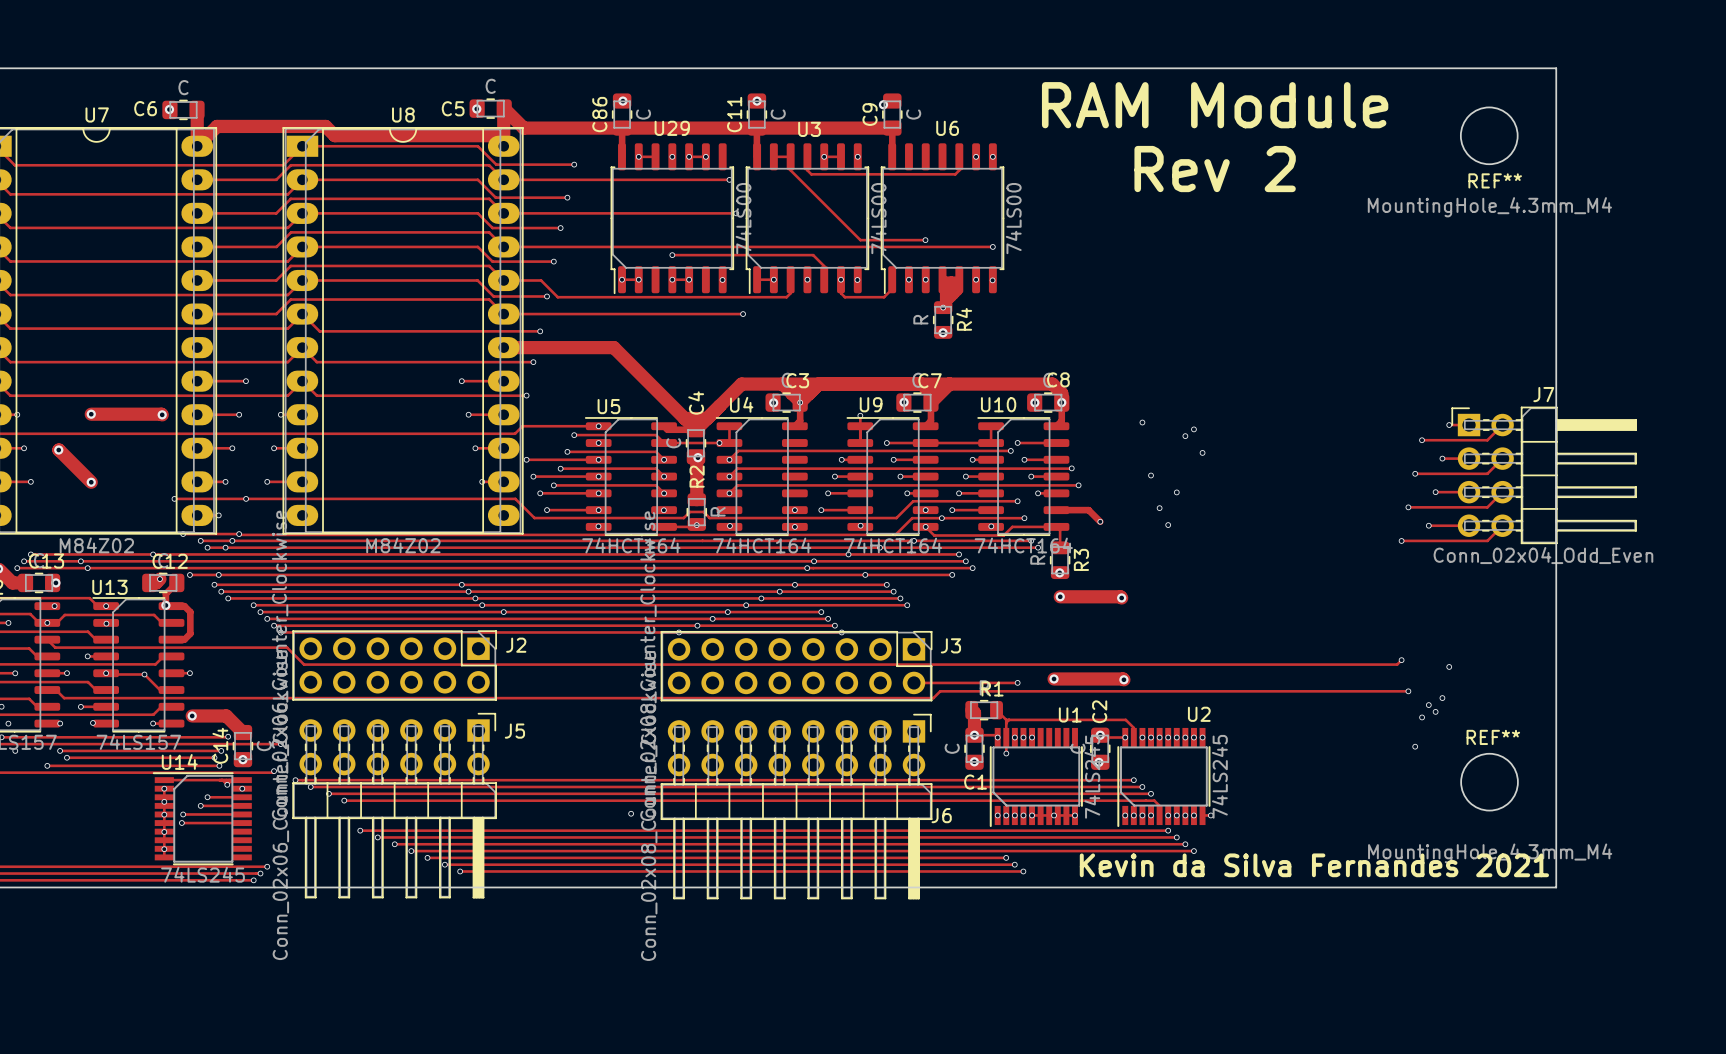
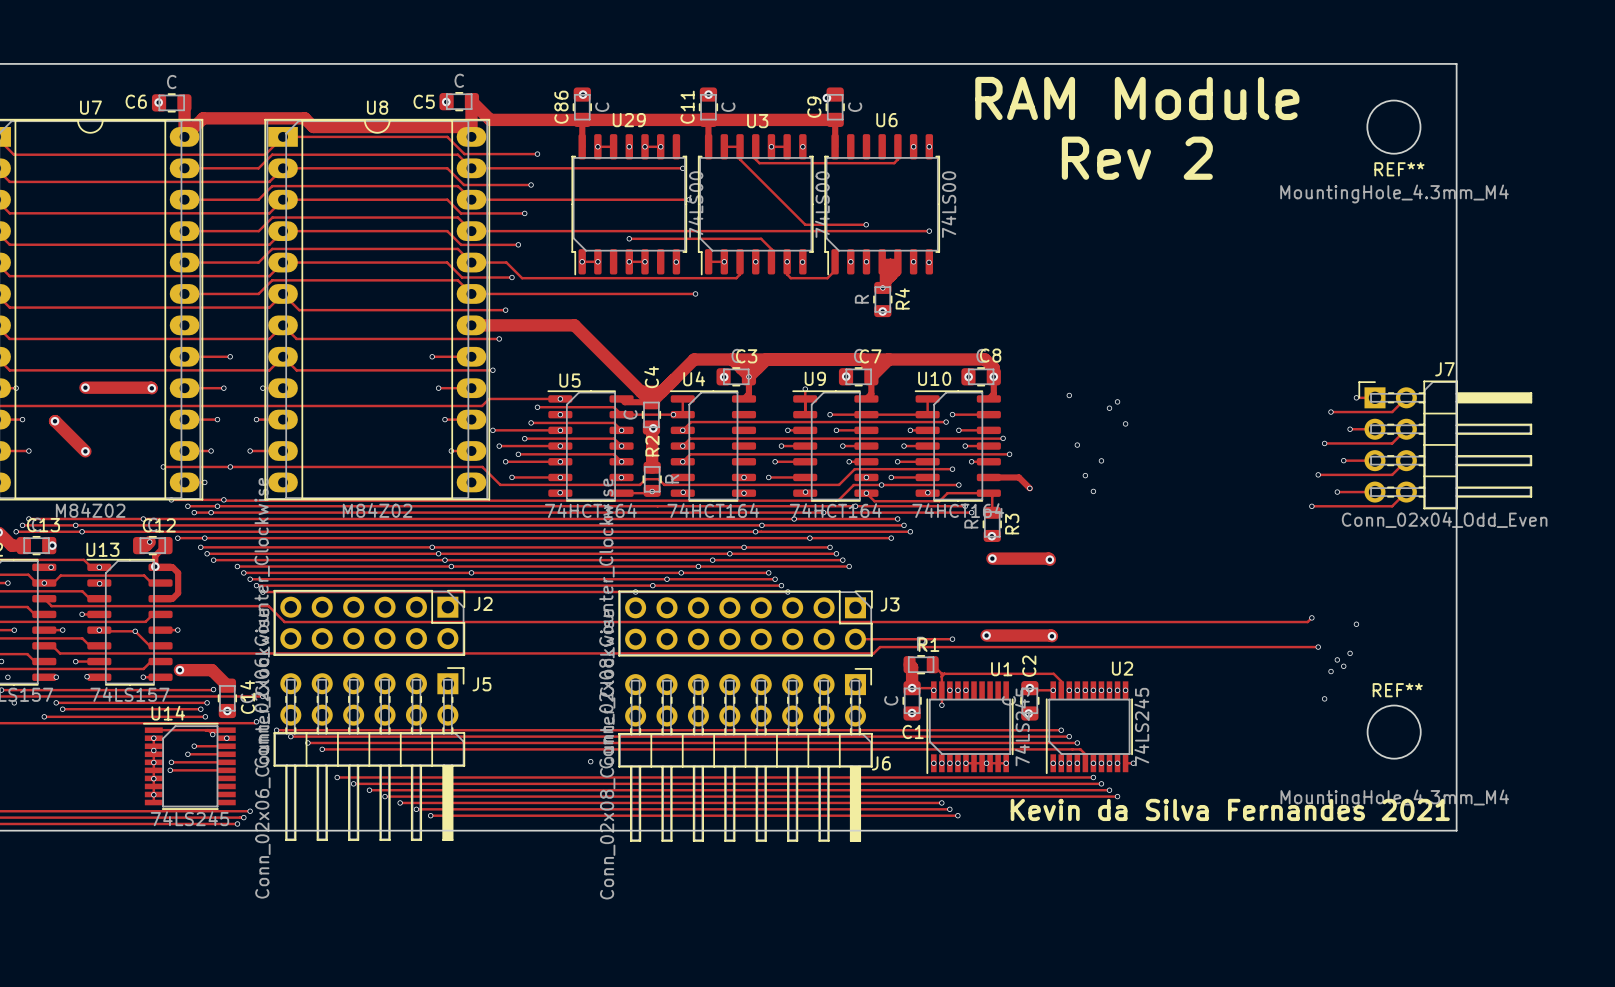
C14 name position: C14 (220, 745) -> C14 (247, 697)

